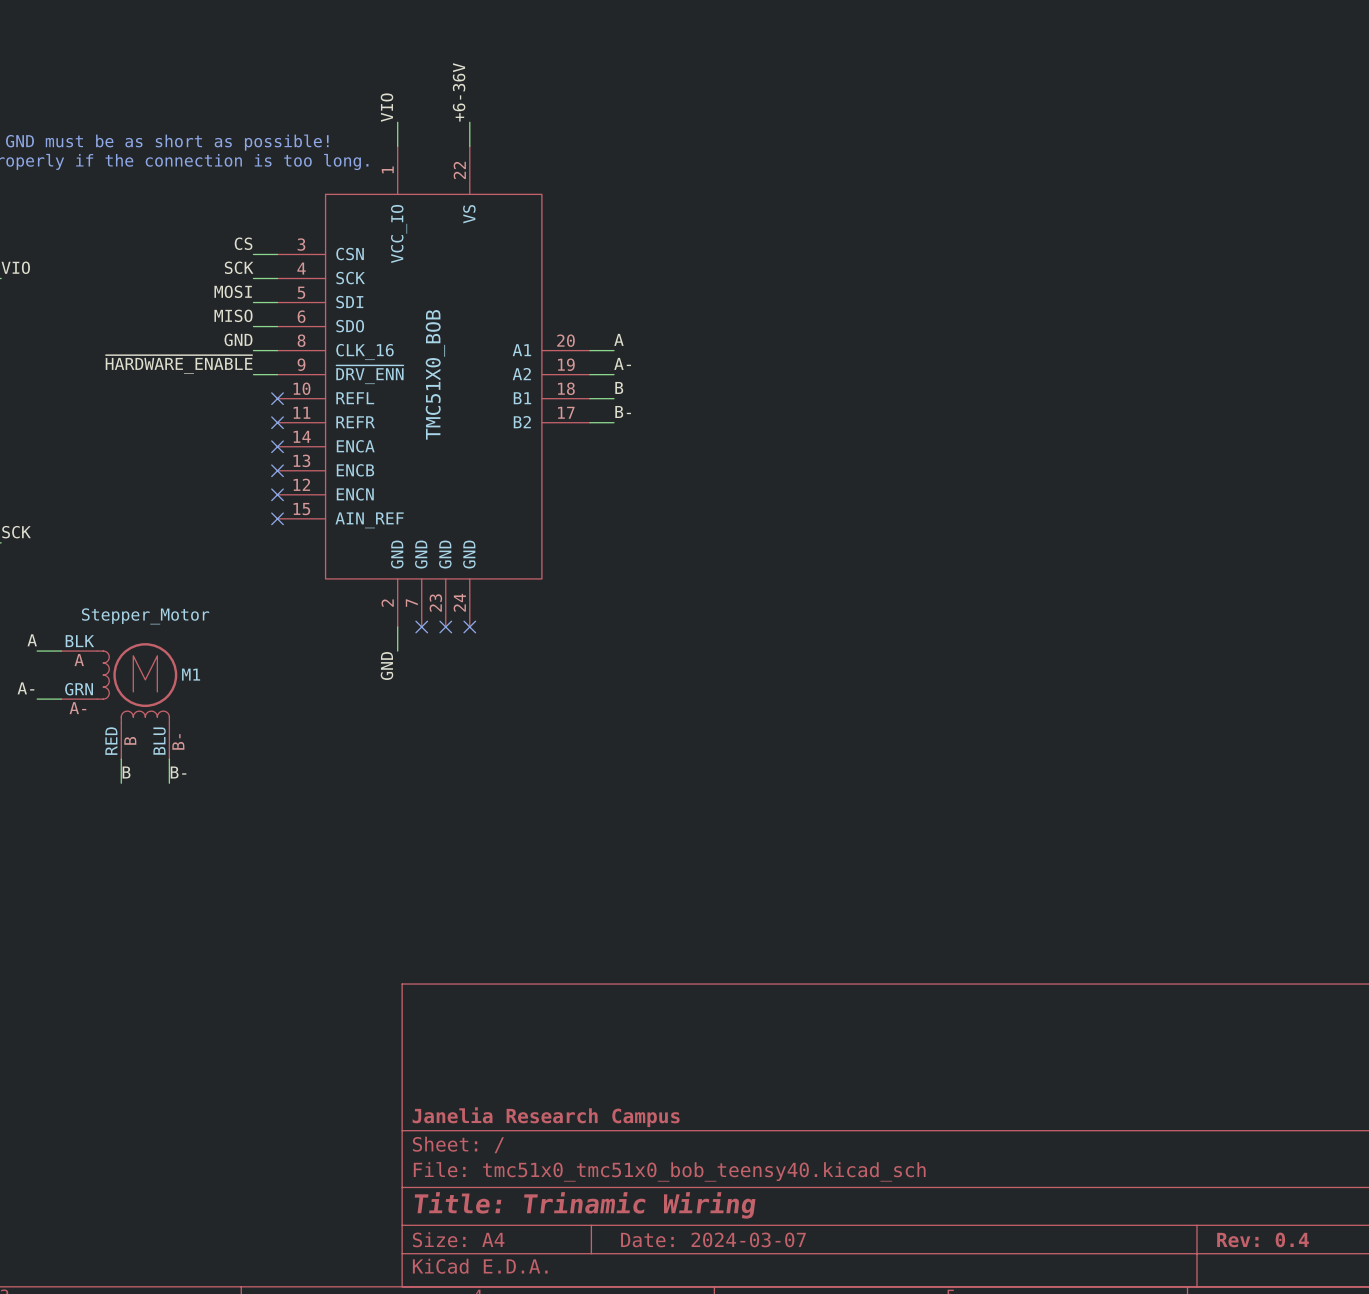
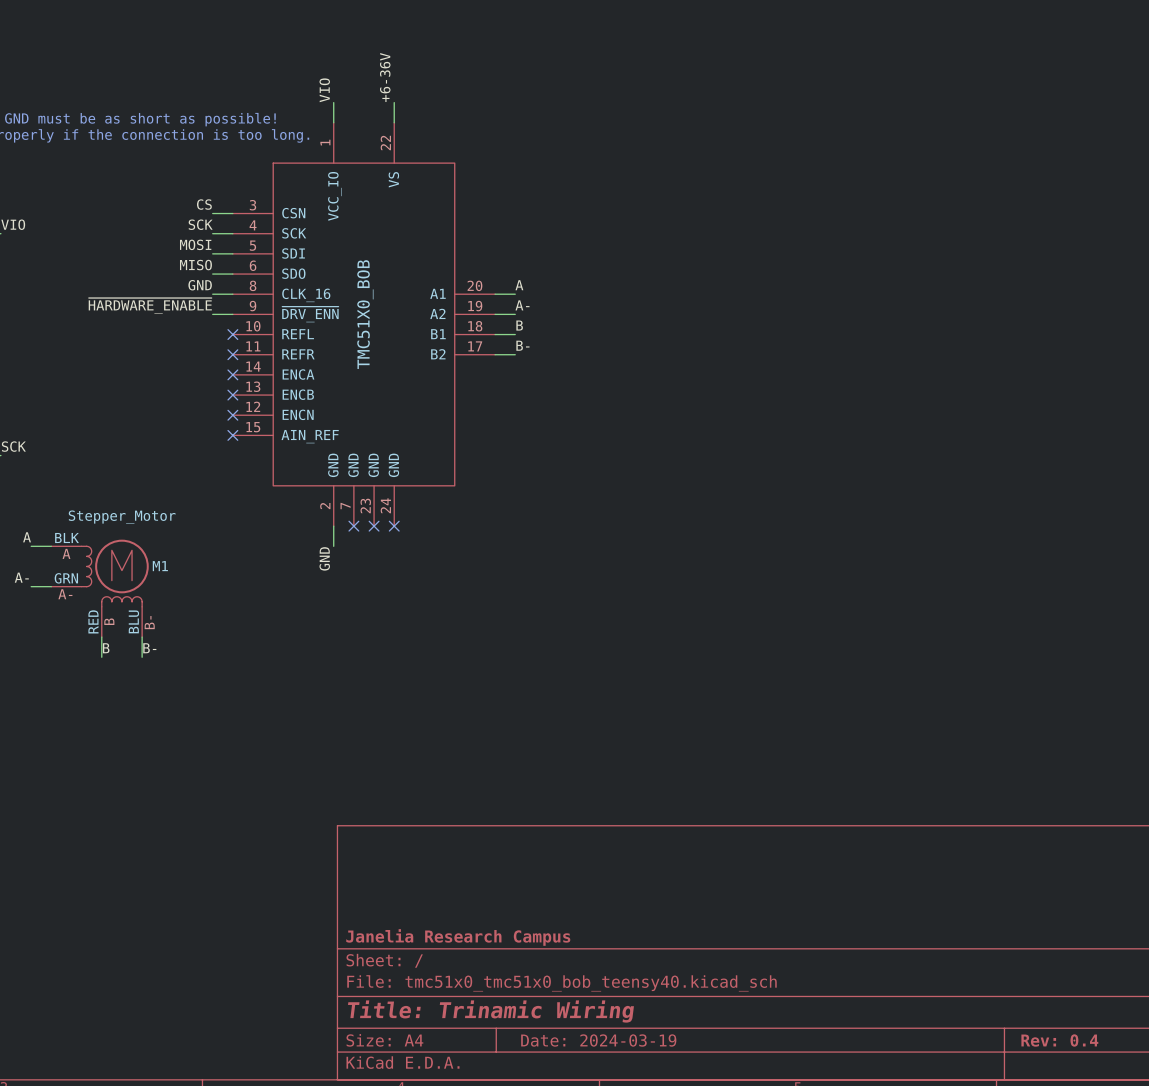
title block: Date: 2024-03-07 (713, 1239) -> Date: 2024-03-19 (598, 1040)

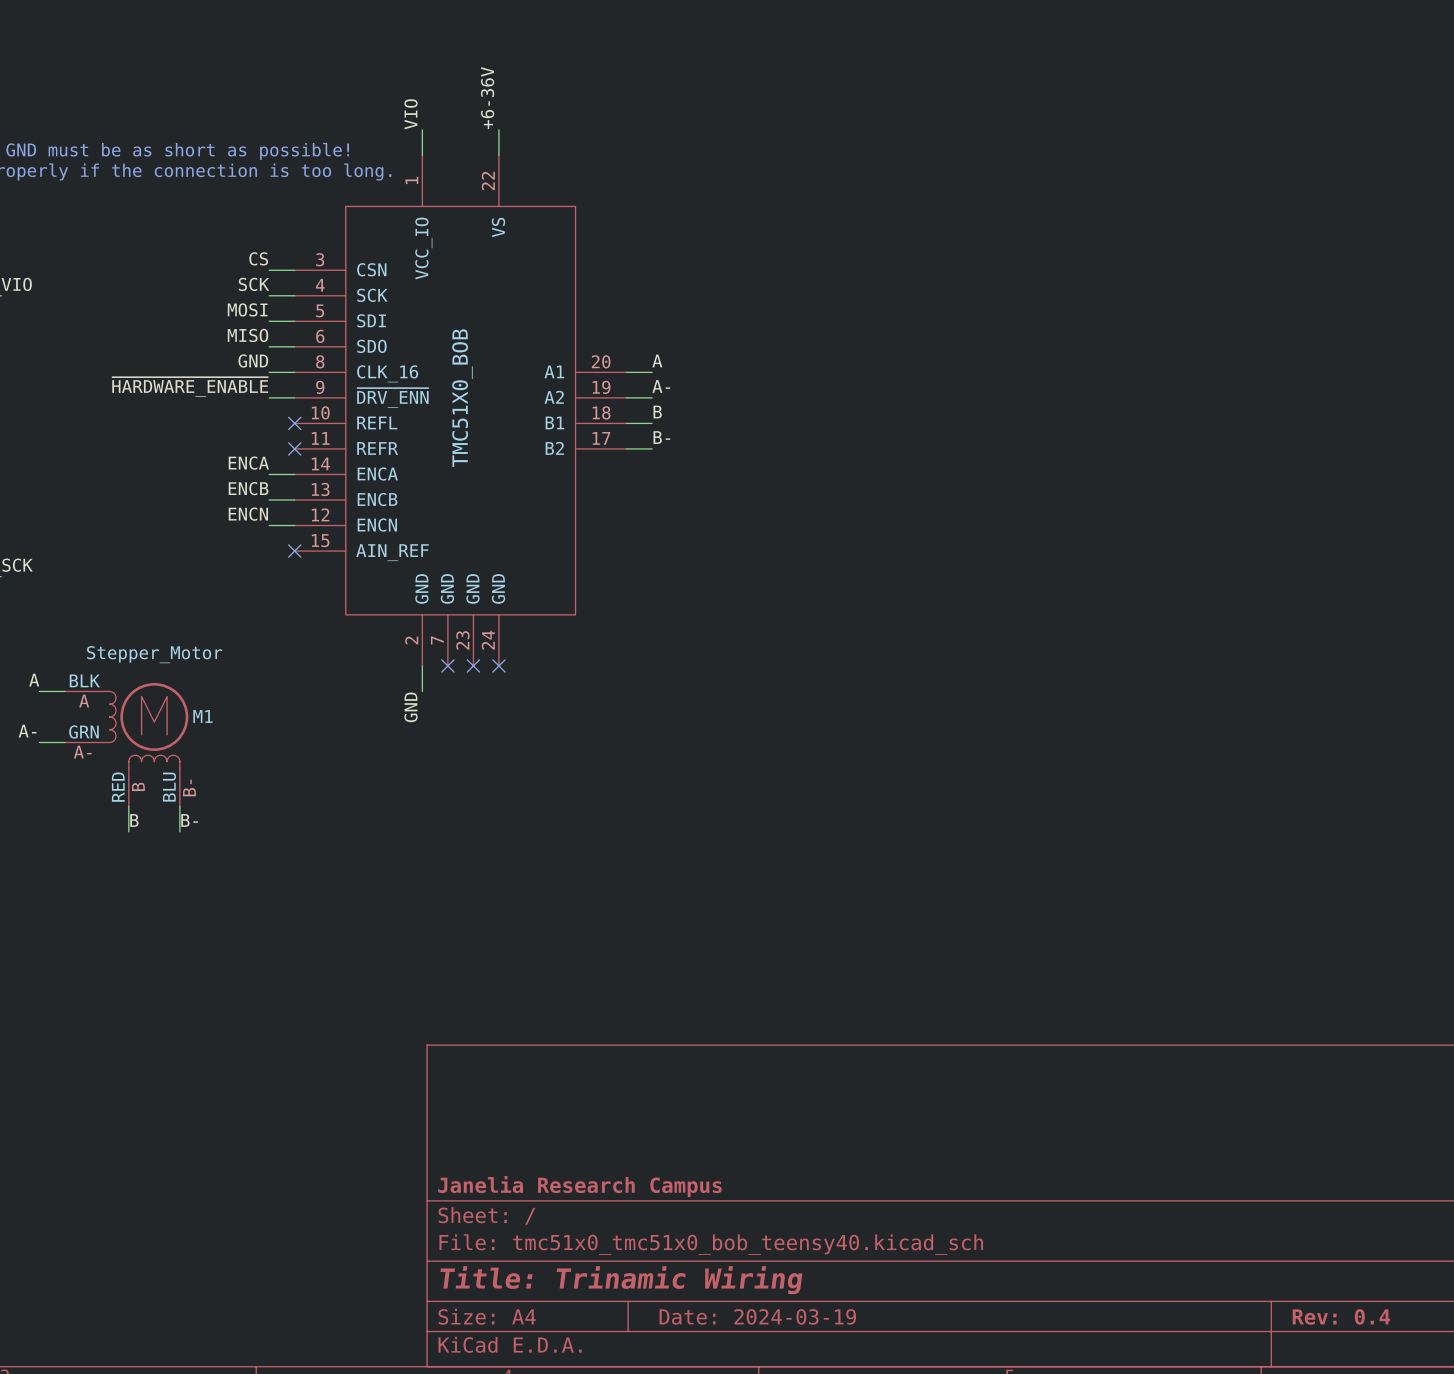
label: none -> ENCA (248, 463)
wire: none -> (269, 474) (294, 474)
no-connect mark: (232, 374) -> none
label: none -> ENCB (248, 488)
wire: none -> (269, 500) (294, 500)
no-connect mark: (232, 395) -> none
label: none -> ENCN (248, 514)
wire: none -> (269, 525) (294, 525)
no-connect mark: (232, 415) -> none

